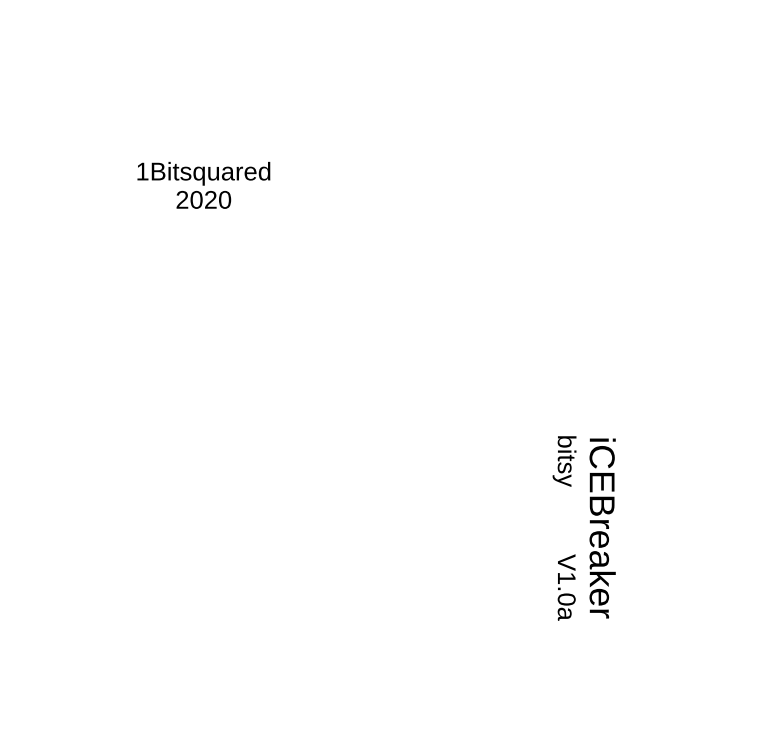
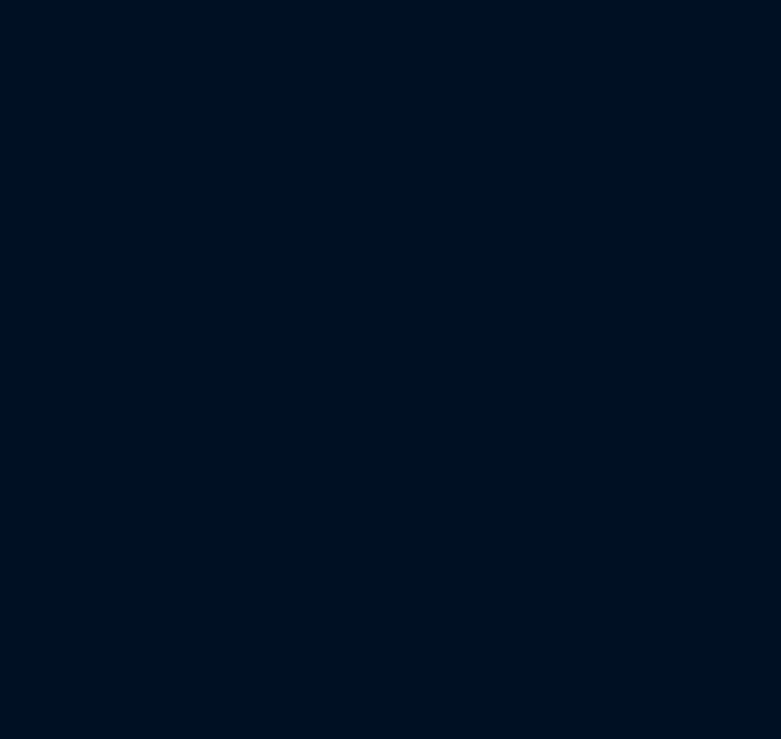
text: 1Bitsquared (203, 173) -> none
text: 2020 (203, 199) -> none
text: bitsy (564, 461) -> none
text: iCEBreaker (602, 528) -> none
text: V1.0a (566, 587) -> none

